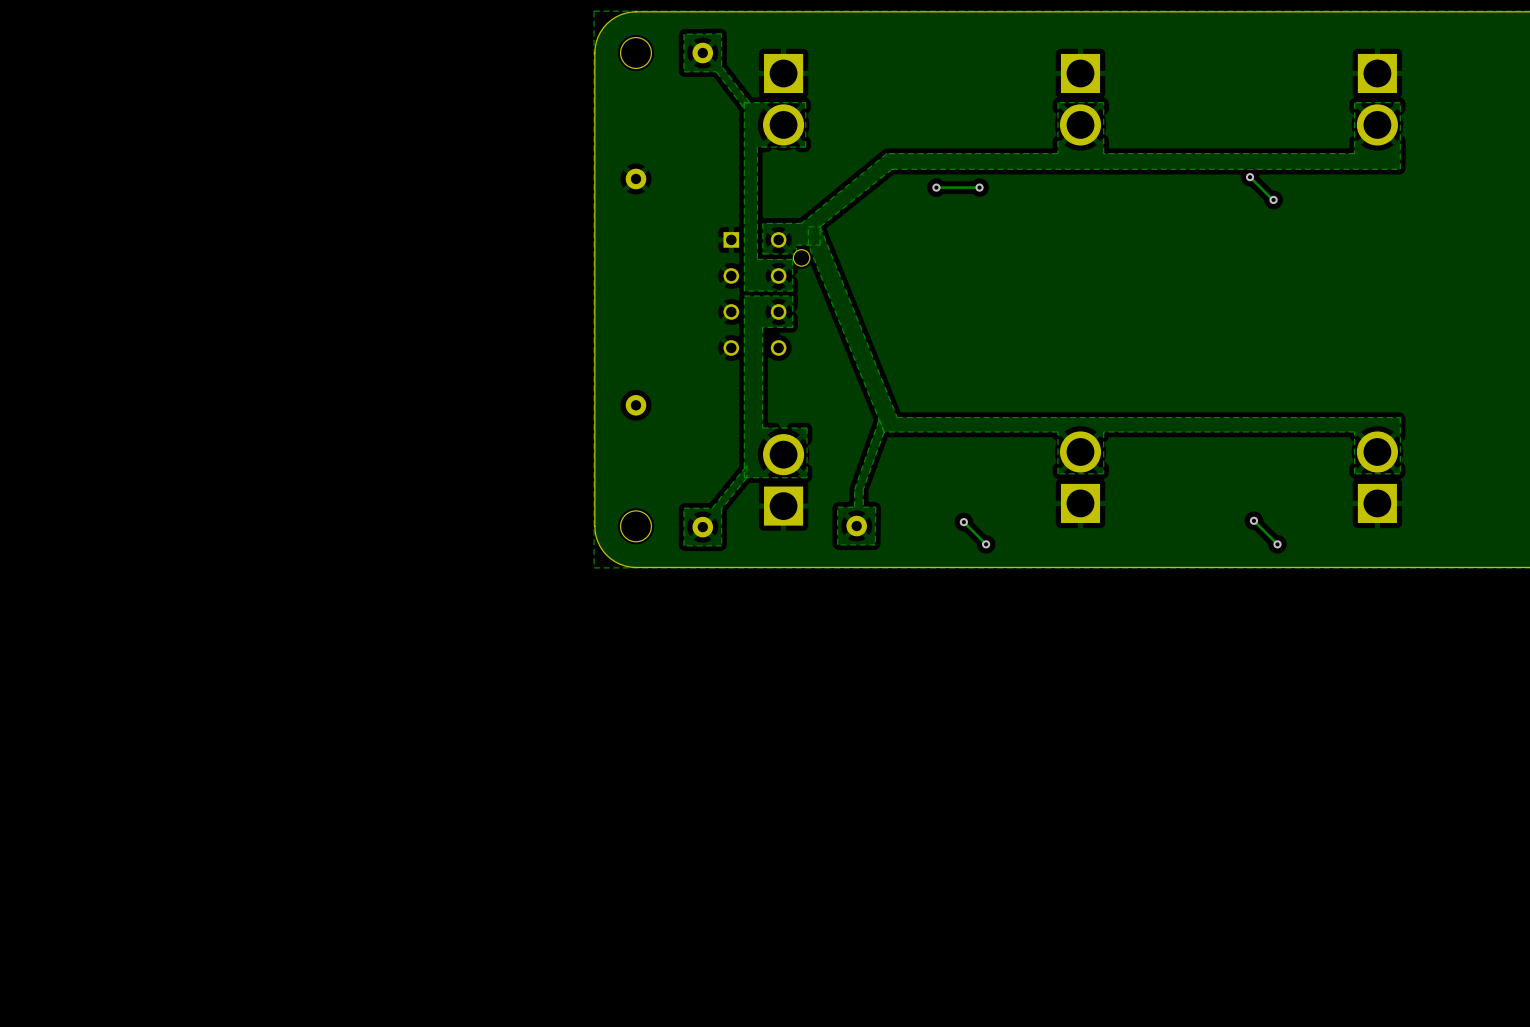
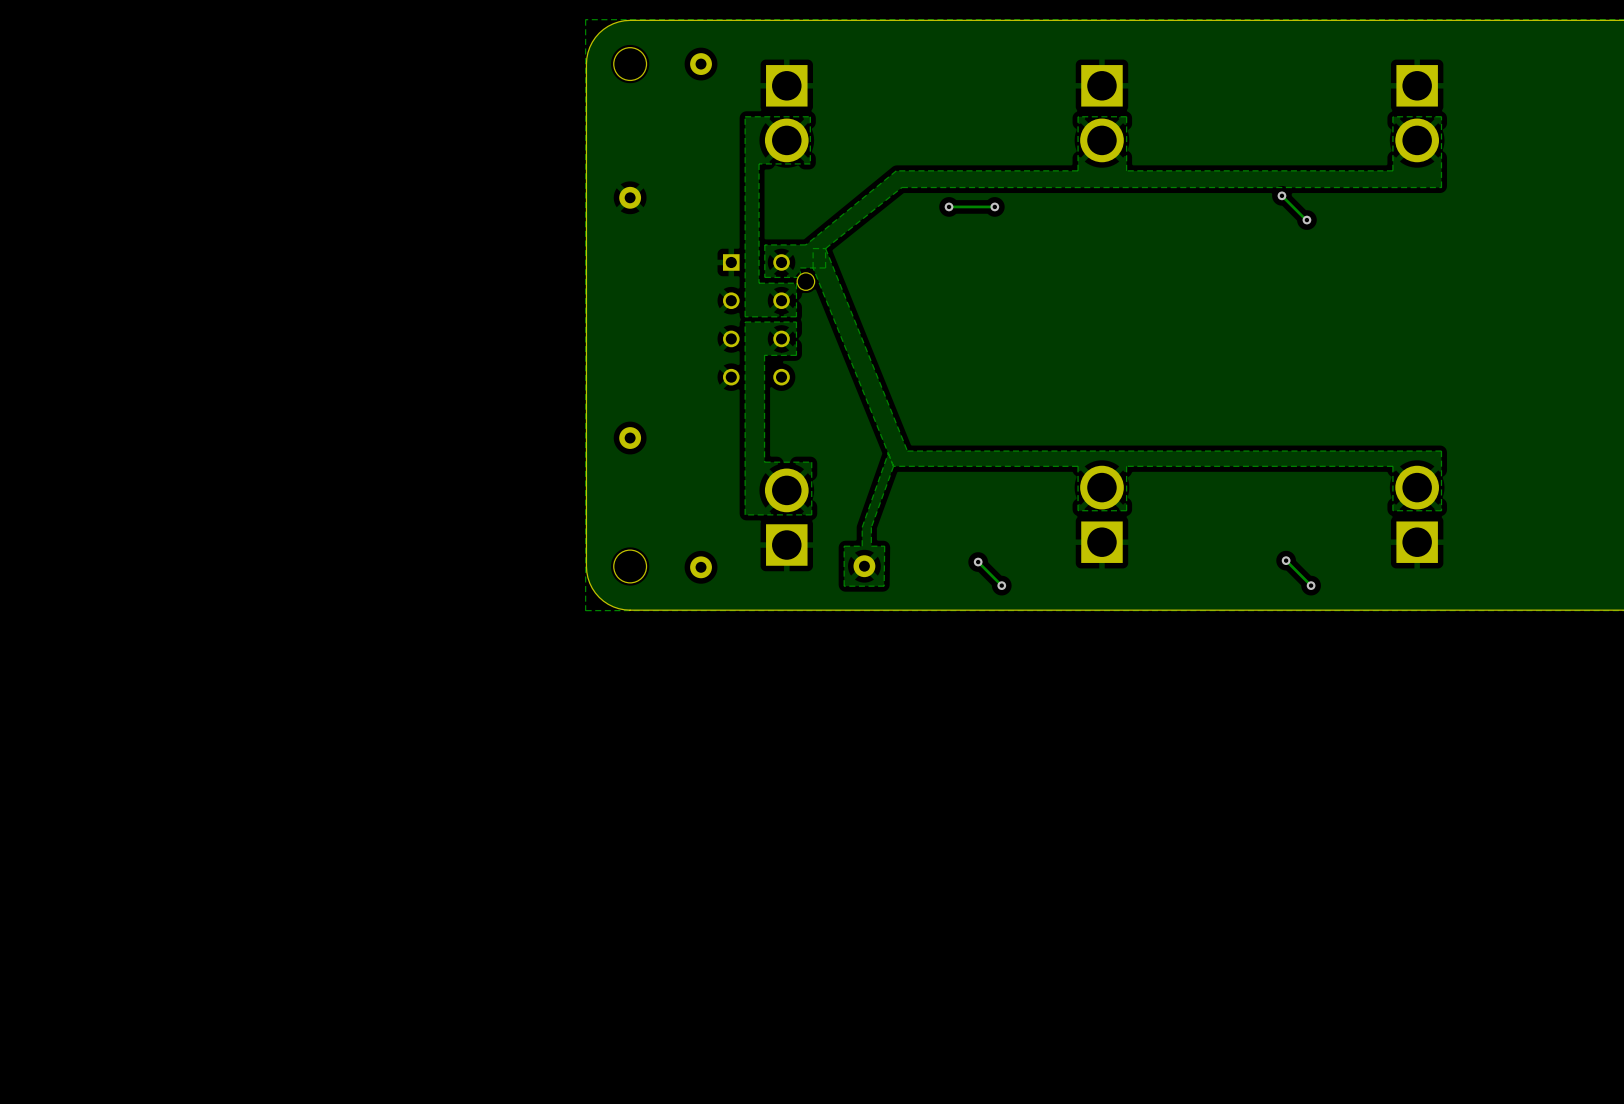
zone outline: (749, 102) (721, 66) (721, 33) (683, 34) (683, 71) (716, 71) (744, 108) -> none
zone outline: (746, 465) (712, 508) (683, 508) (683, 545) (721, 545) (721, 508) (746, 477) (746, 465) -> none

